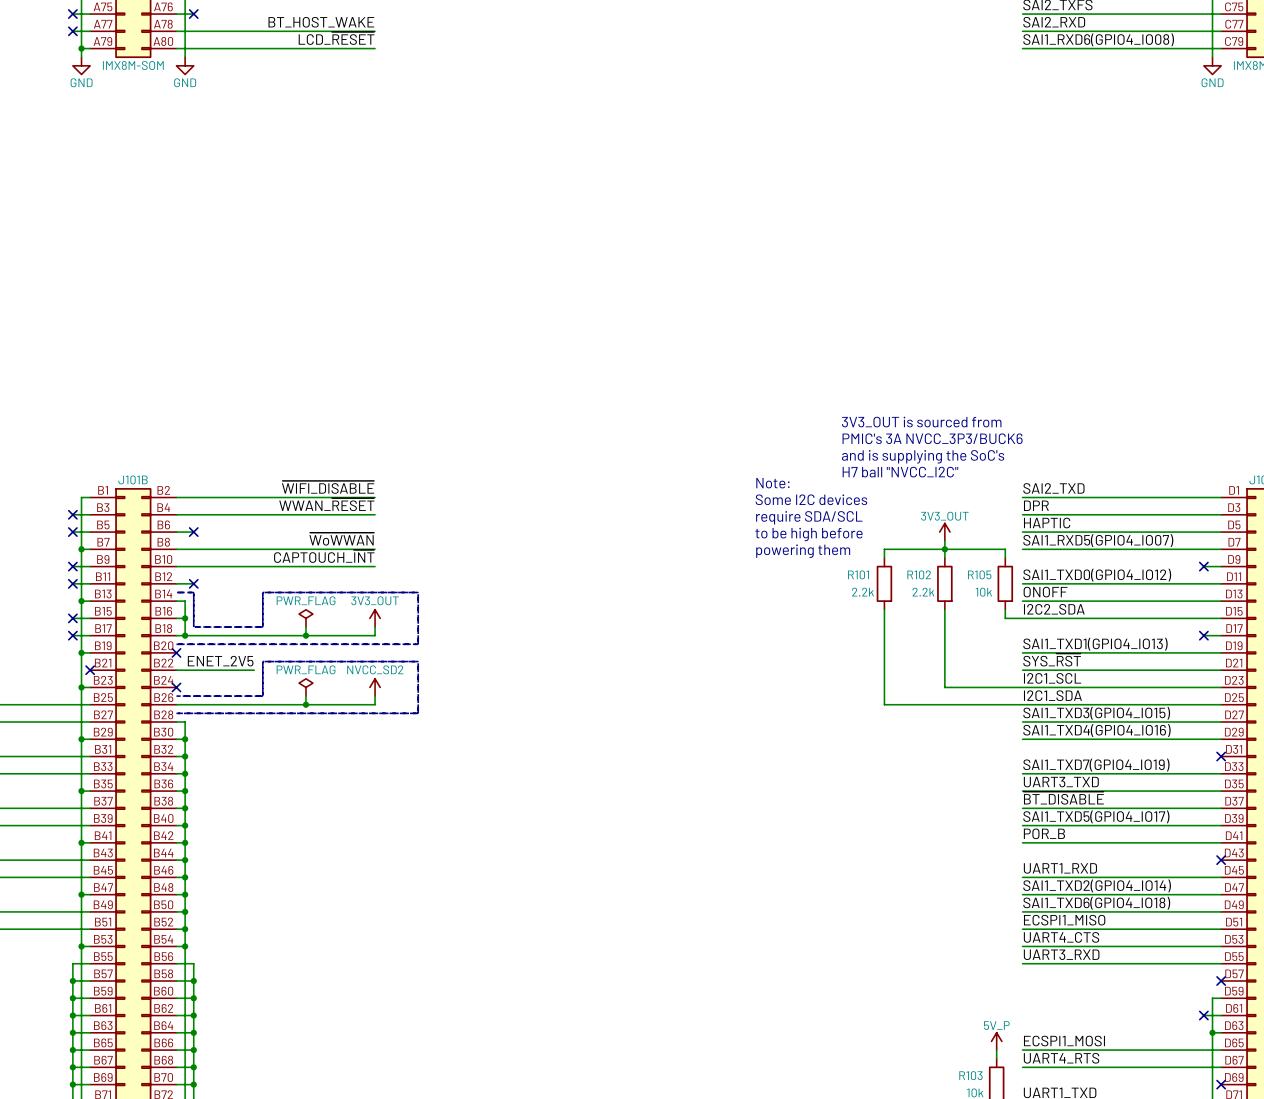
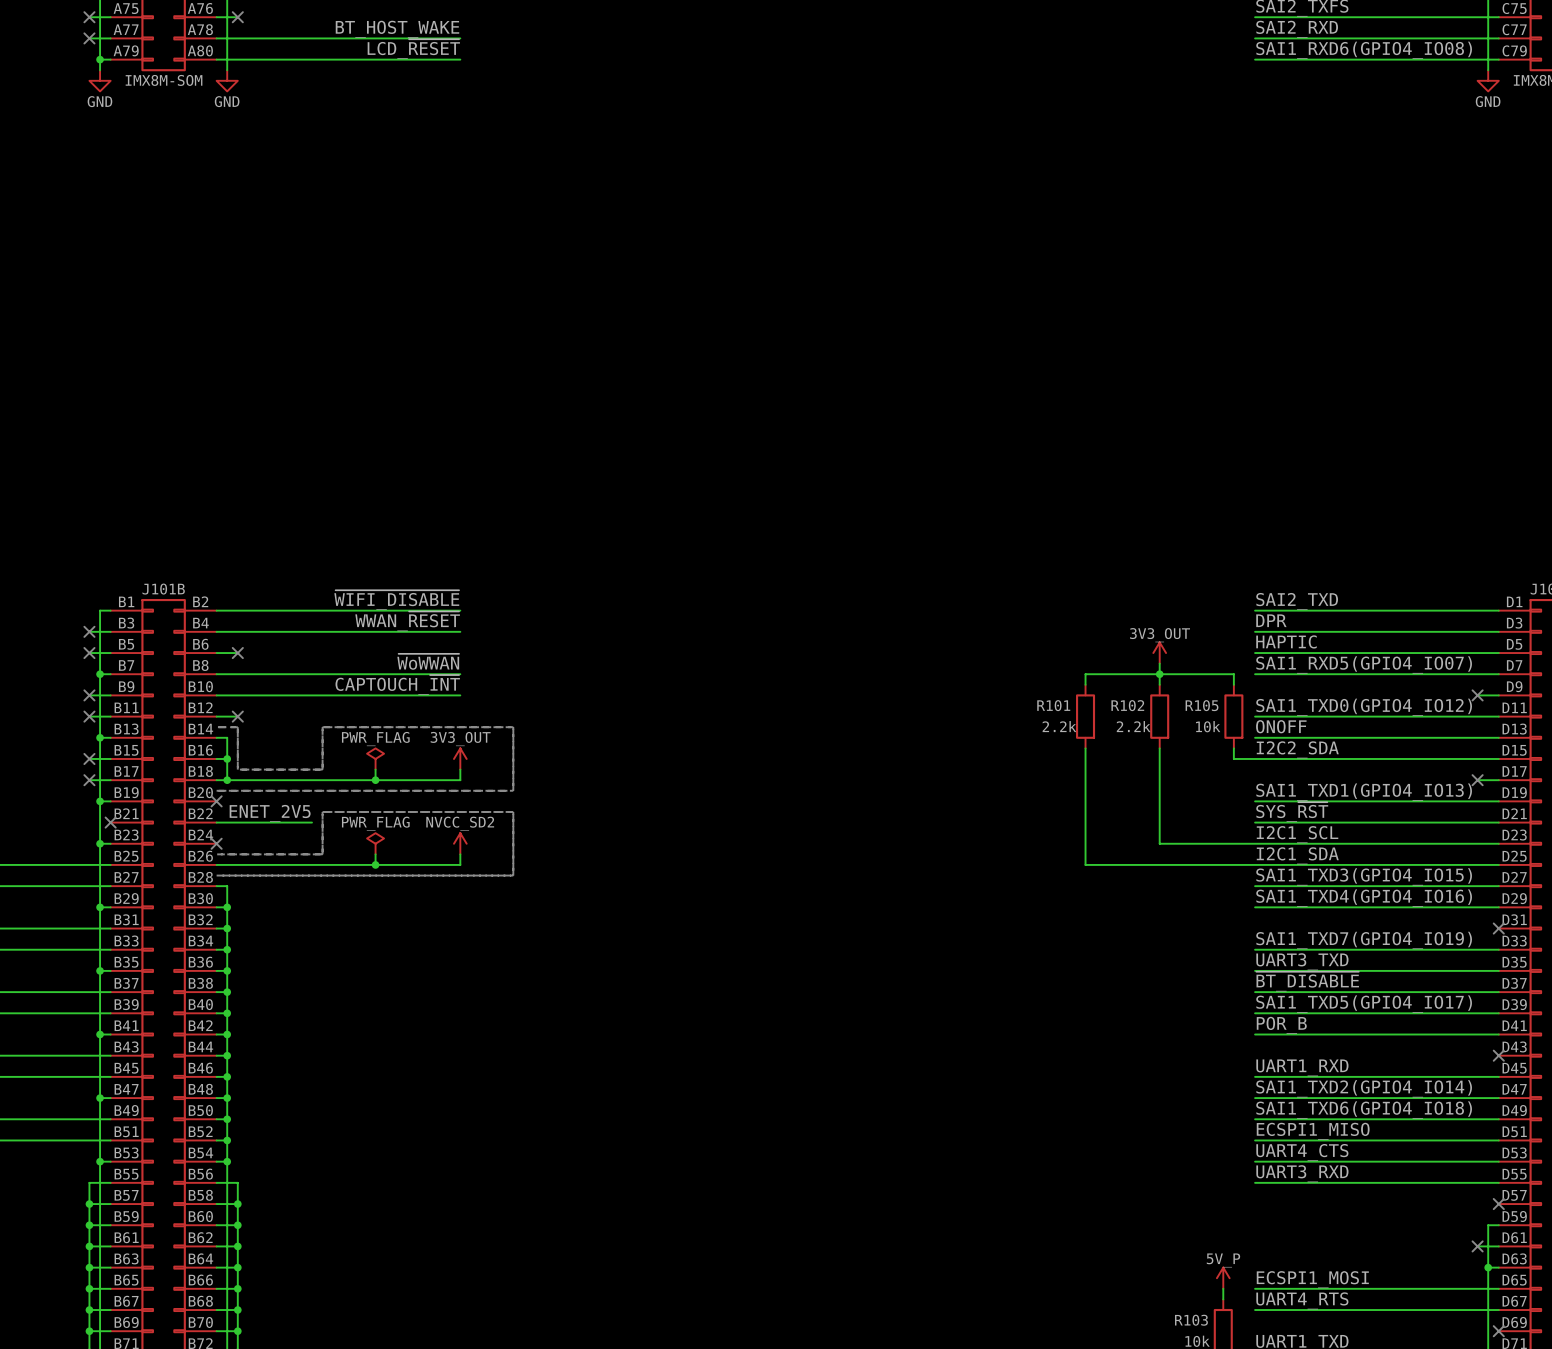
text: 3V3_OUT is sourced from (921, 422) -> none
text: PMIC's 3A NVCC_3P3/BUCK6 (932, 438) -> none
text: and is supplying the SoC's (923, 456) -> none
text: H7 ball "NVCC_I2C" (900, 472) -> none
text: Note: (772, 483) -> none
text: Some I2C devices (811, 499) -> none
text: require SDA/SCL (809, 517) -> none
text: to be high before (809, 534) -> none
text: powering them (803, 551) -> none

